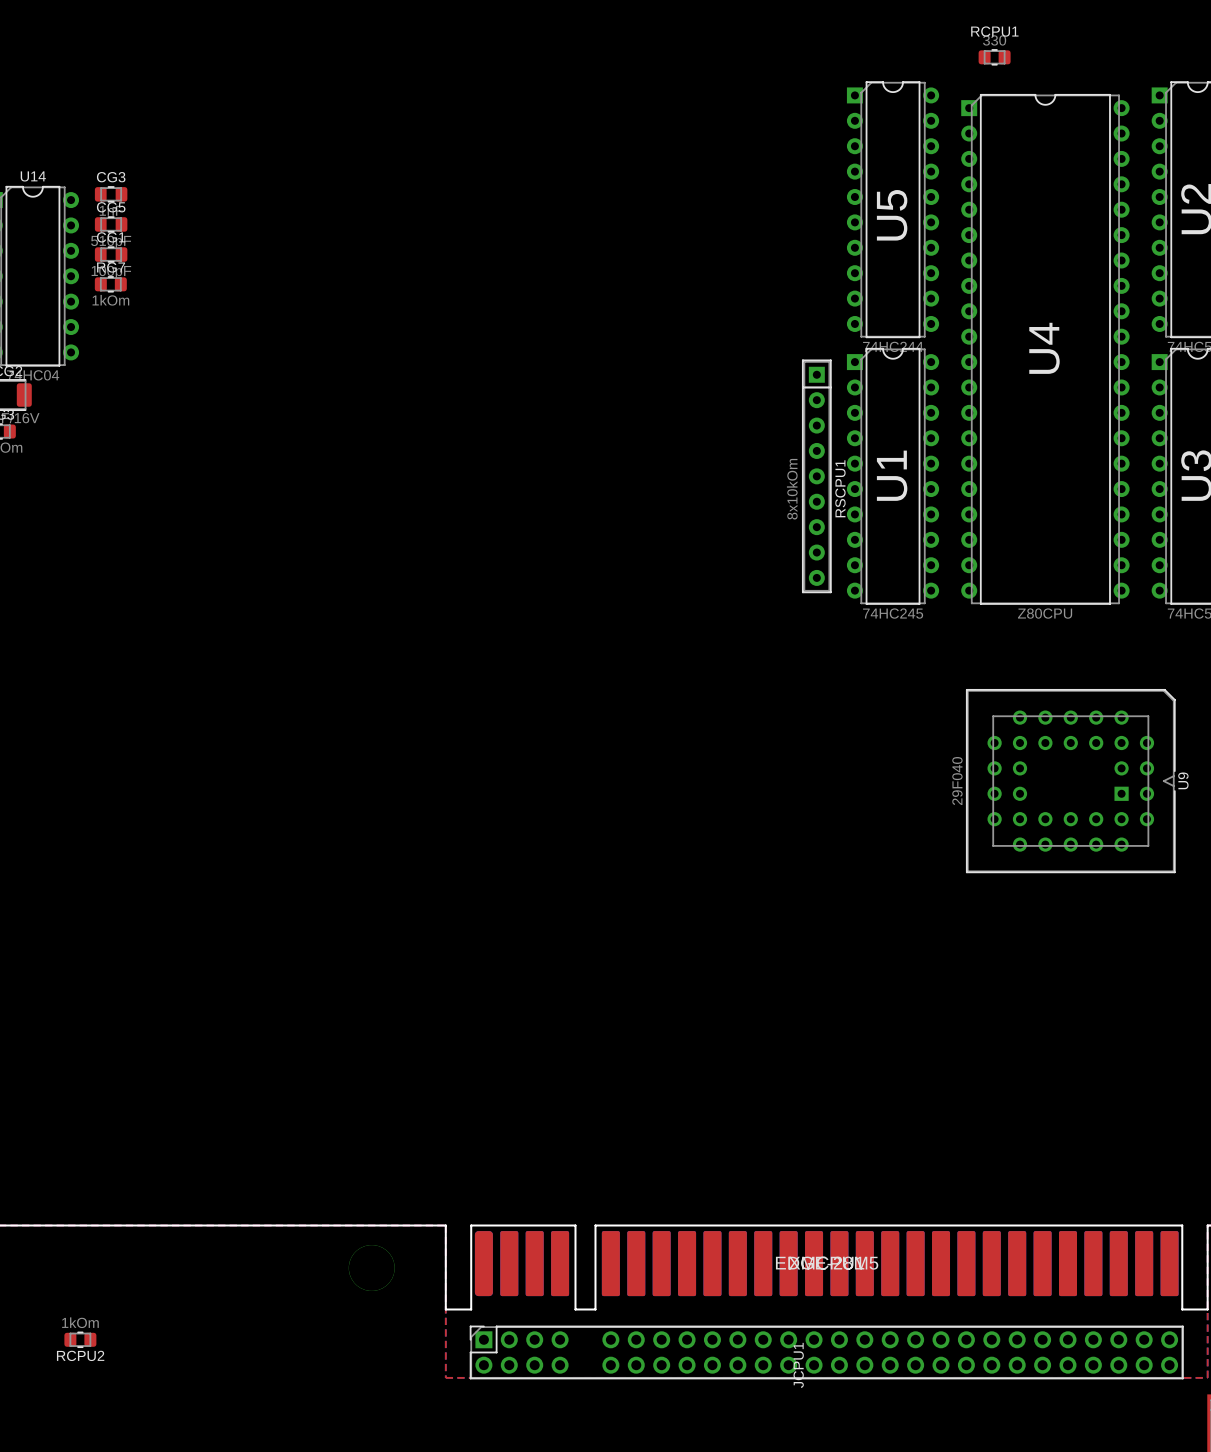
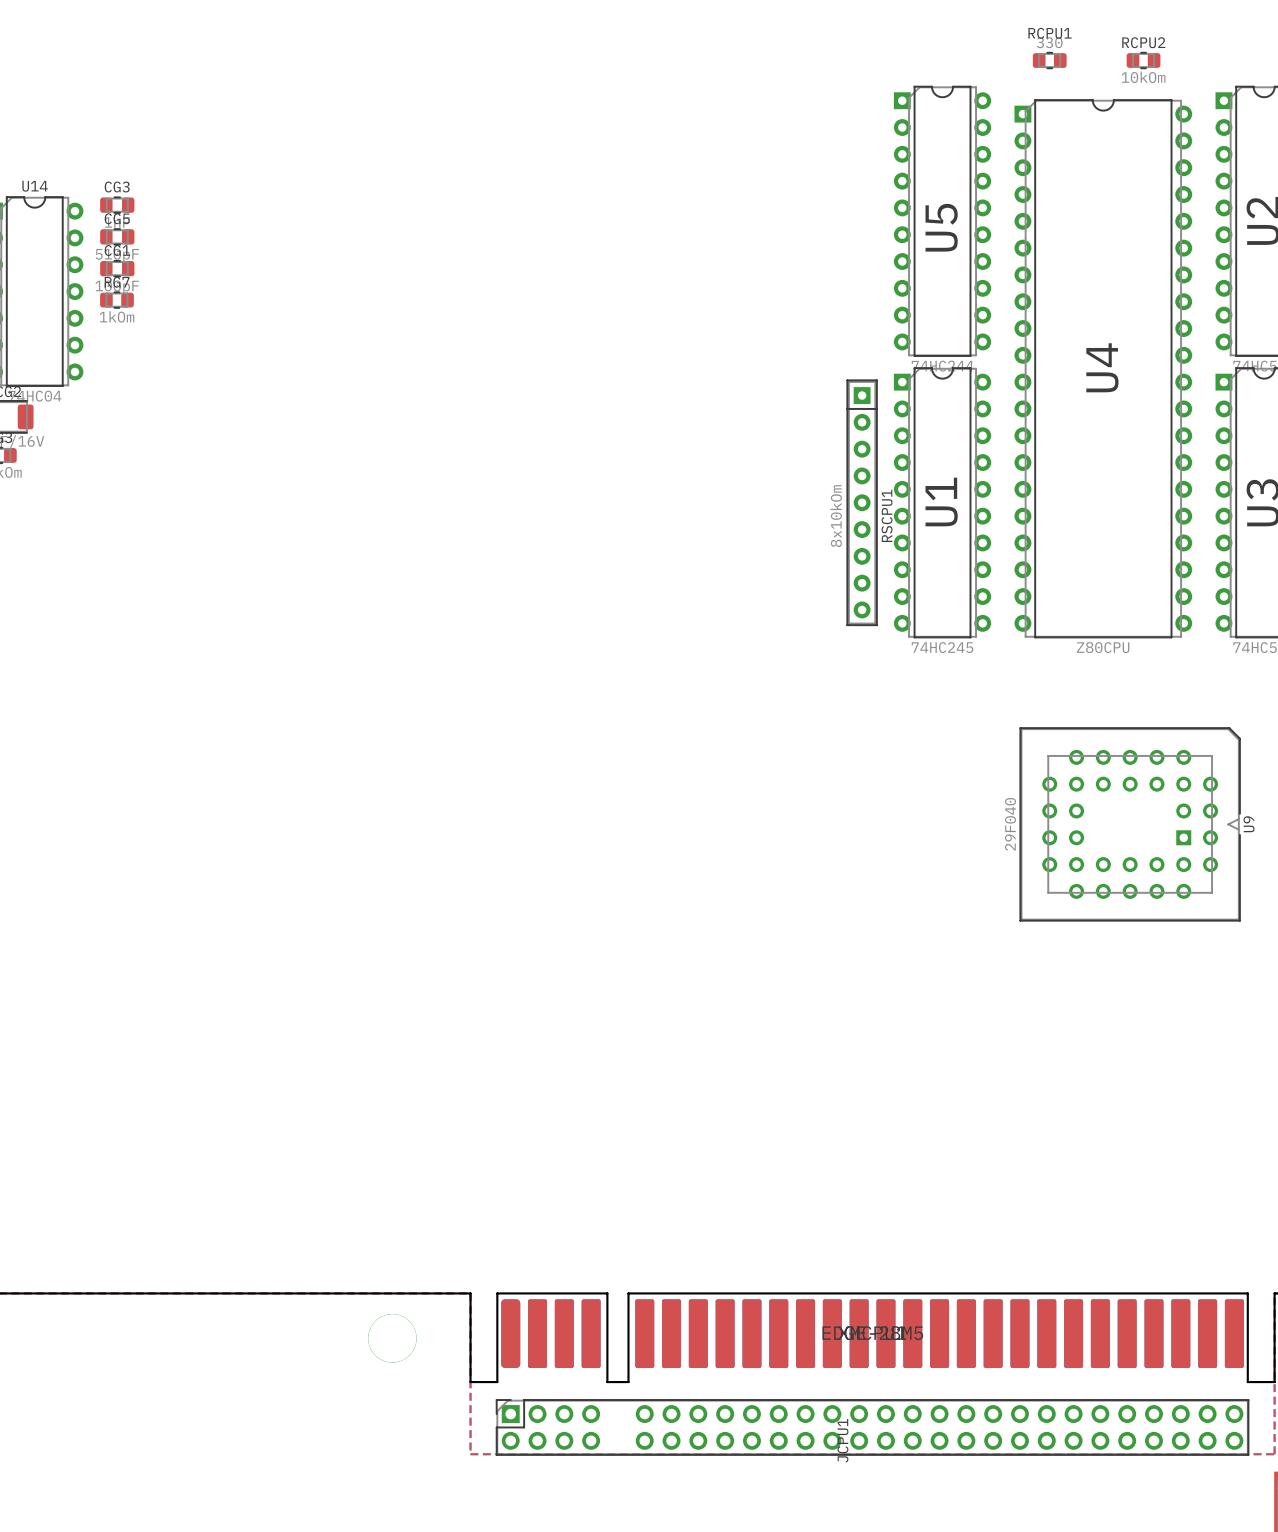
RCPU2 value: 1kOm (80, 1322) -> 10kOm (1143, 77)
RCPU2 position: (80, 1339) -> (1143, 60)
RCPU2 name position: RCPU2 (80, 1355) -> RCPU2 (1143, 42)

